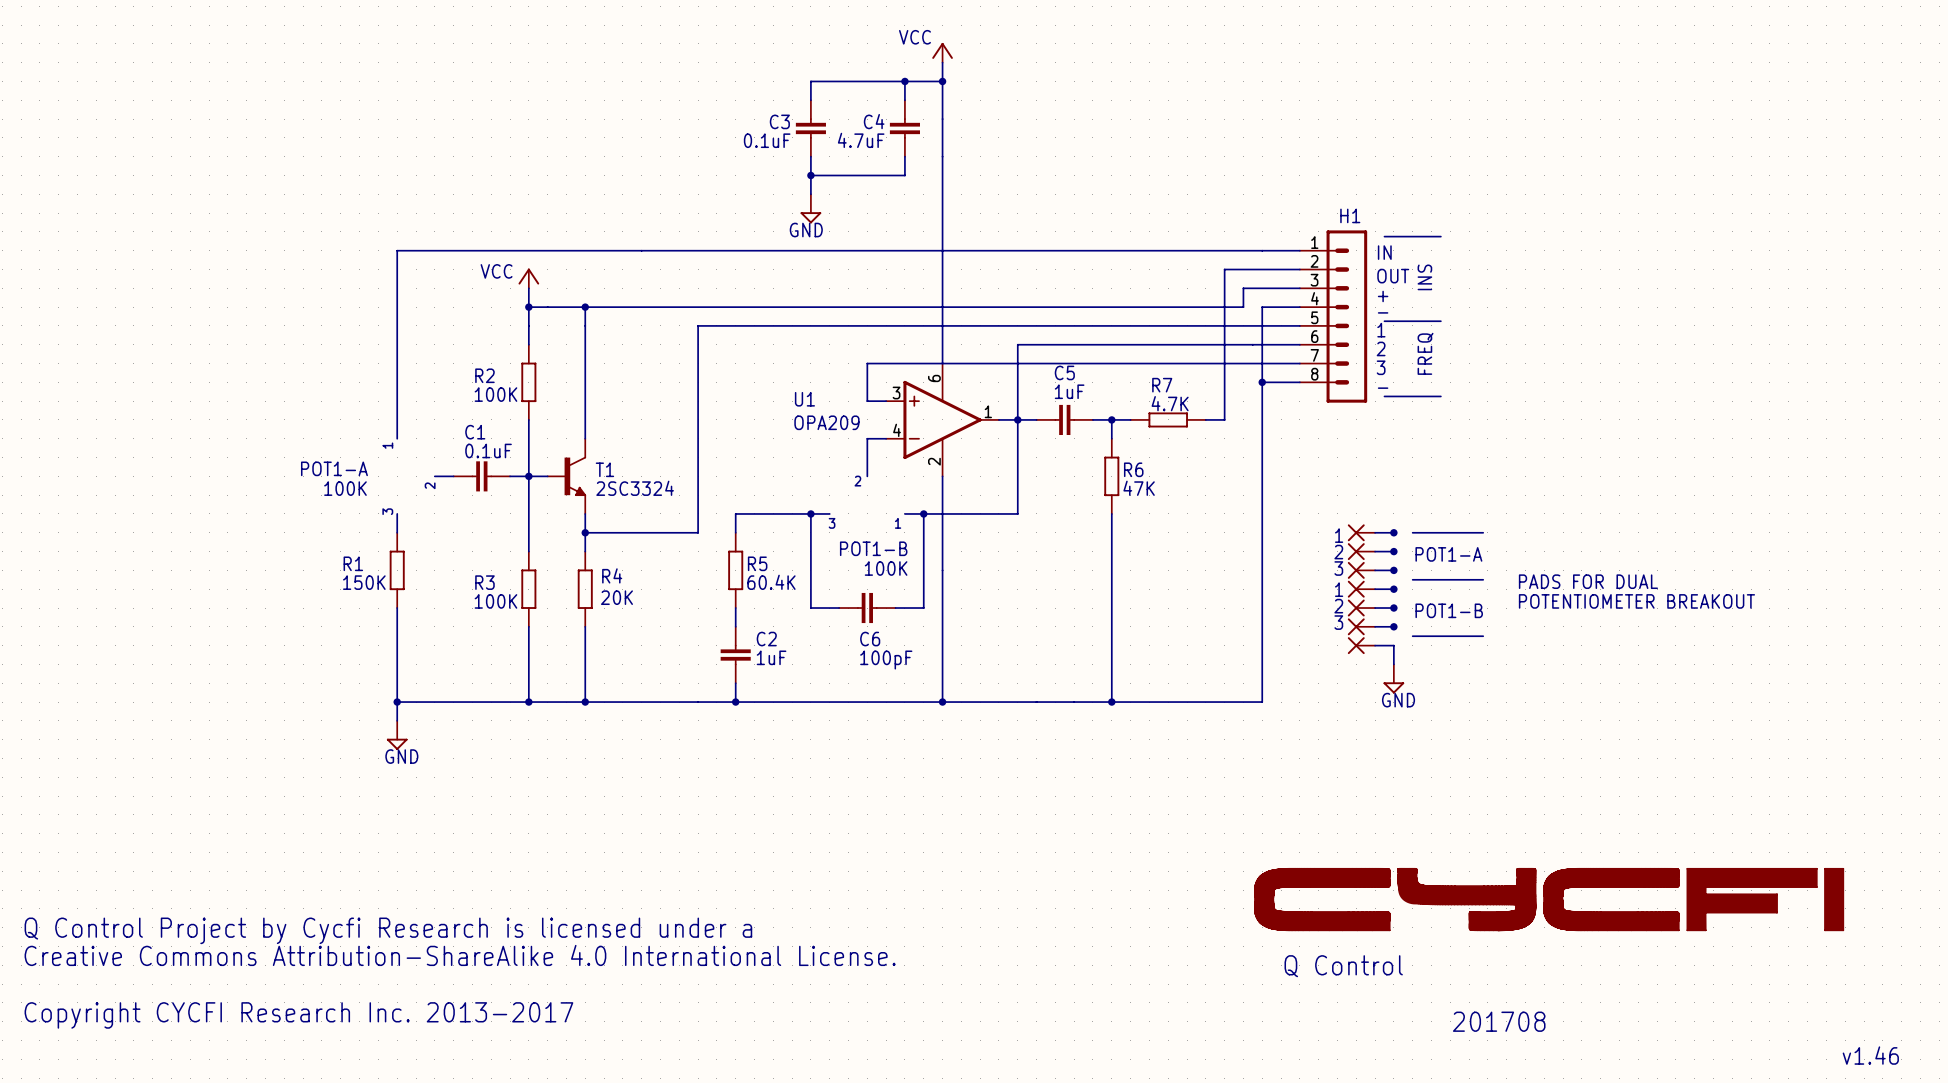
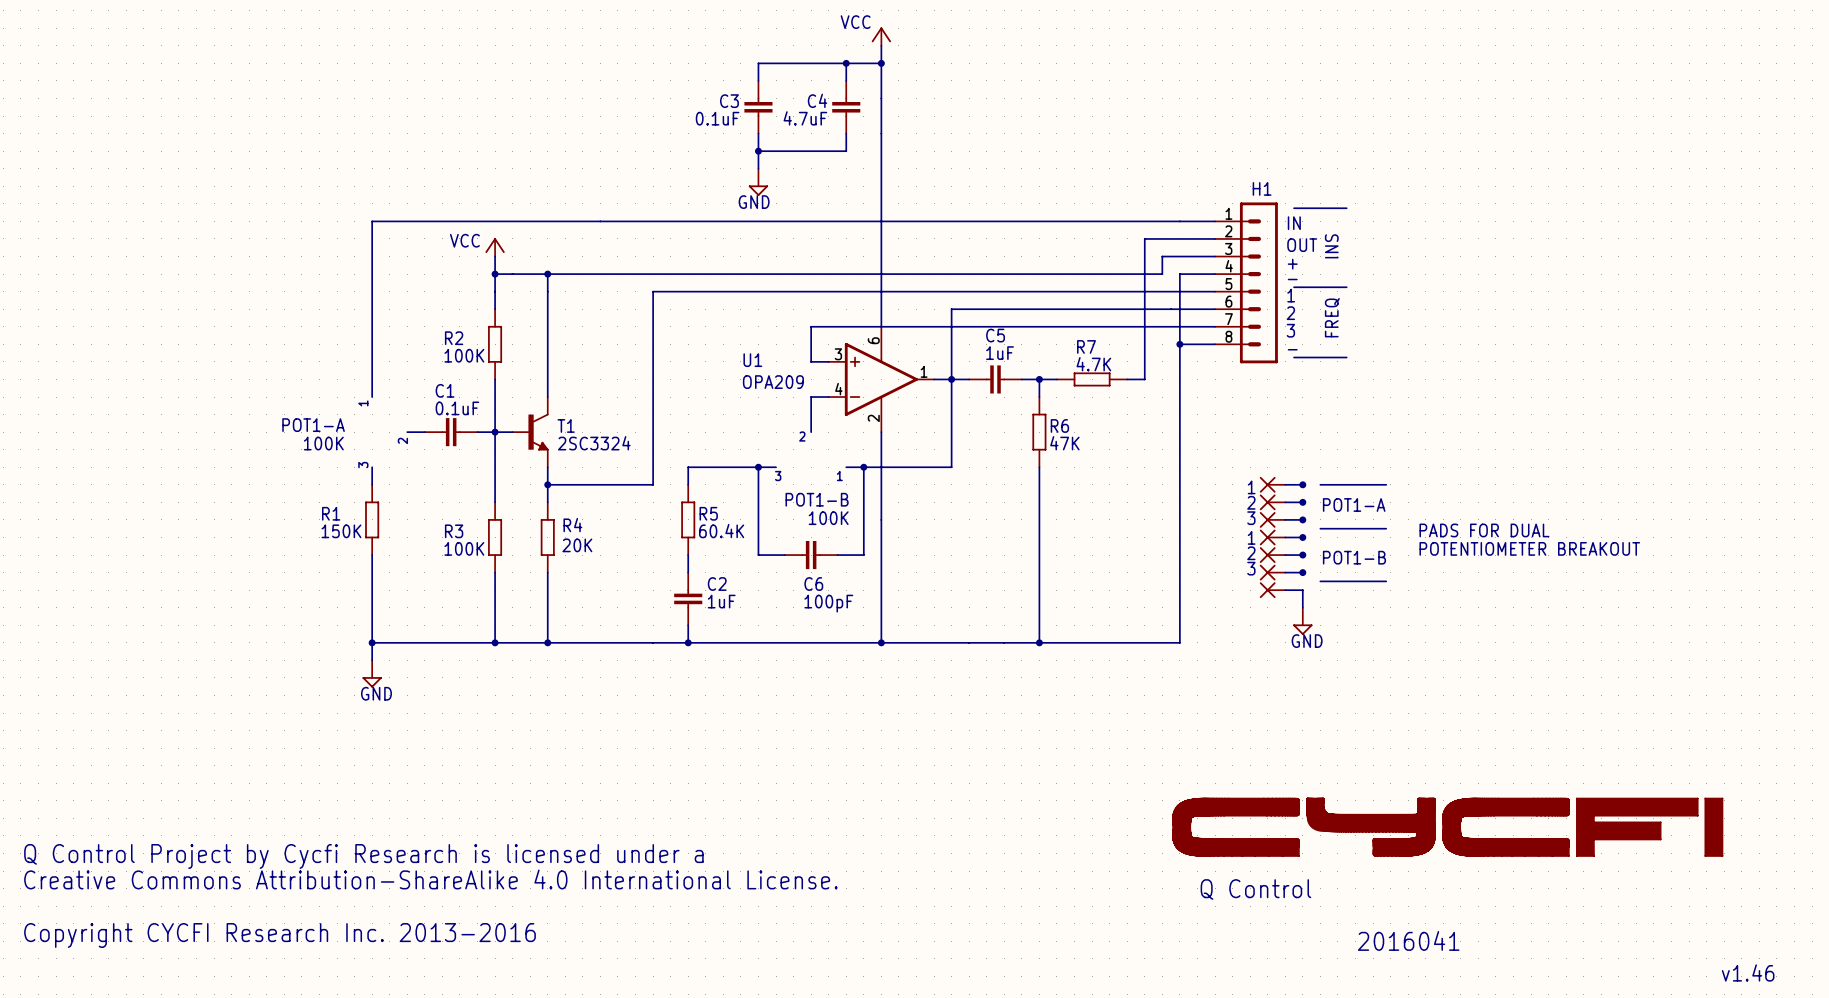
text: Copyright CYCFI Research Inc. 2013-2017 (298, 1015) -> Copyright CYCFI Research Inc. 2013-2016 (280, 935)
text: 201708 (1499, 1021) -> 2016041 (1408, 940)

